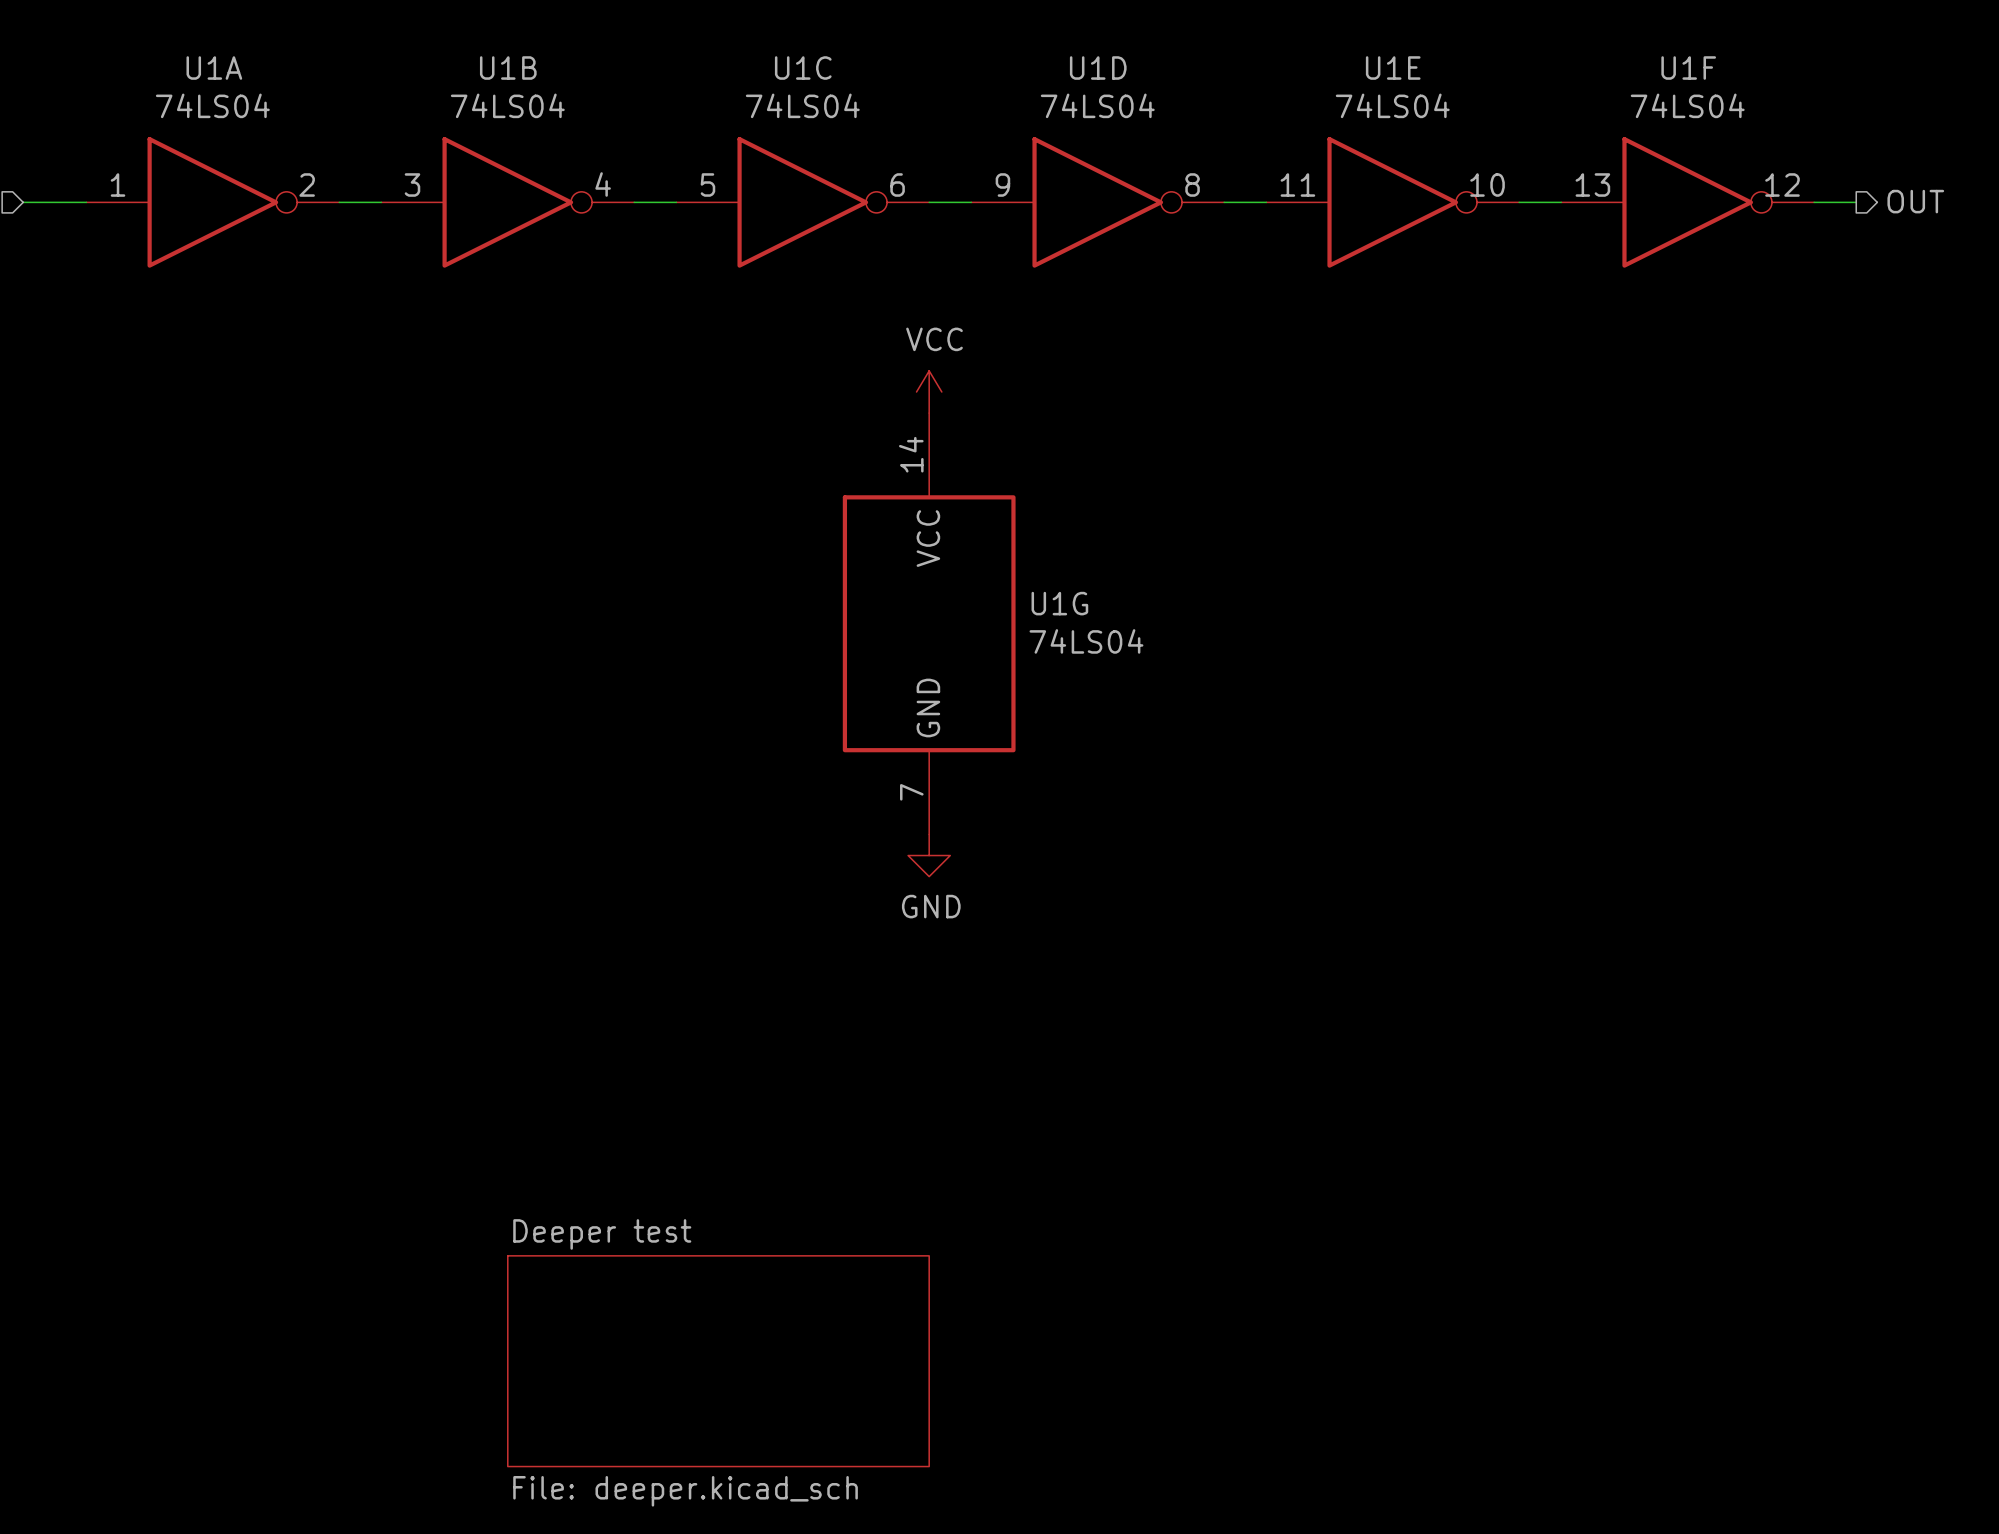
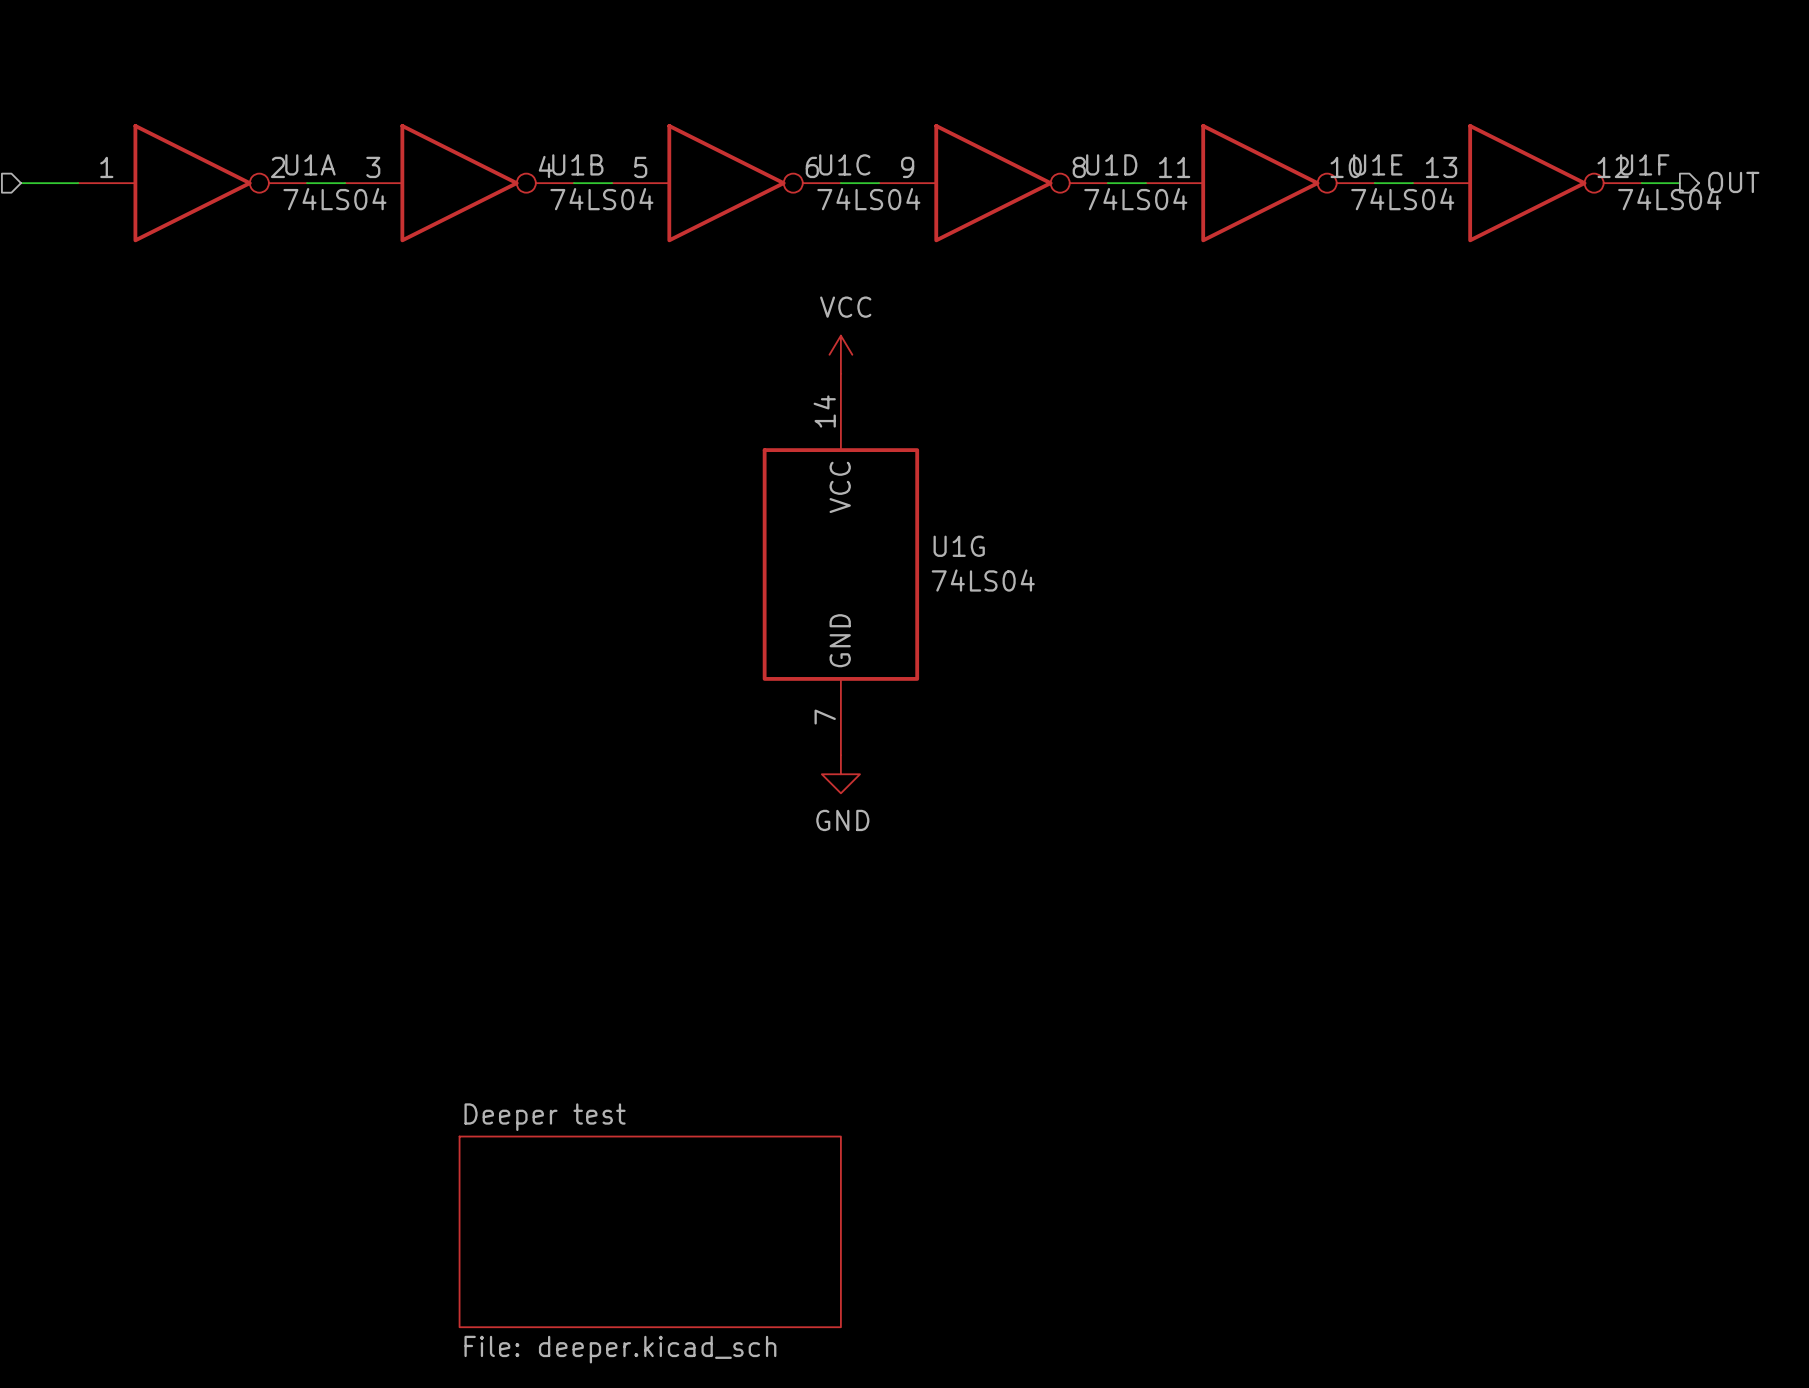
U1A name position: U1A (214, 68) -> U1A (310, 164)
U1B name position: U1B (508, 68) -> U1B (577, 164)
U1C name position: U1C (803, 68) -> U1C (844, 164)
U1D name position: U1D (1098, 68) -> U1D (1111, 164)
U1E name position: U1E (1393, 68) -> U1E (1377, 164)
U1F name position: U1F (1688, 68) -> U1F (1644, 164)
U1A value position: 74LS04 (212, 105) -> 74LS04 (334, 199)
U1B value position: 74LS04 (507, 105) -> 74LS04 (601, 199)
U1C value position: 74LS04 (802, 105) -> 74LS04 (868, 199)
U1D value position: 74LS04 (1097, 105) -> 74LS04 (1135, 199)
U1E value position: 74LS04 (1392, 105) -> 74LS04 (1402, 199)
U1F value position: 74LS04 (1687, 105) -> 74LS04 (1669, 199)

